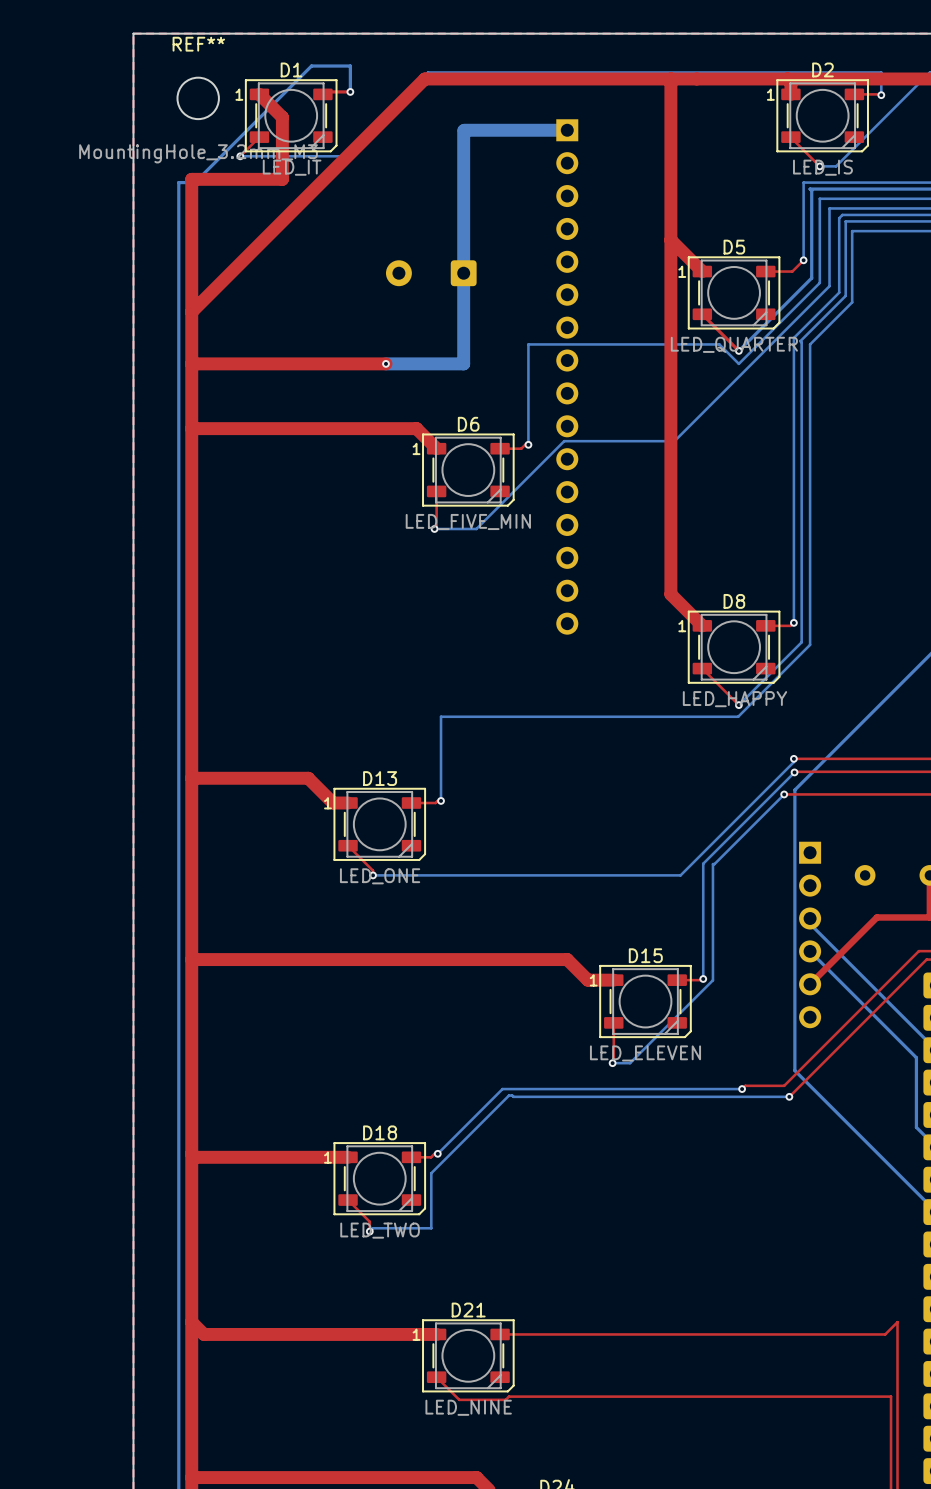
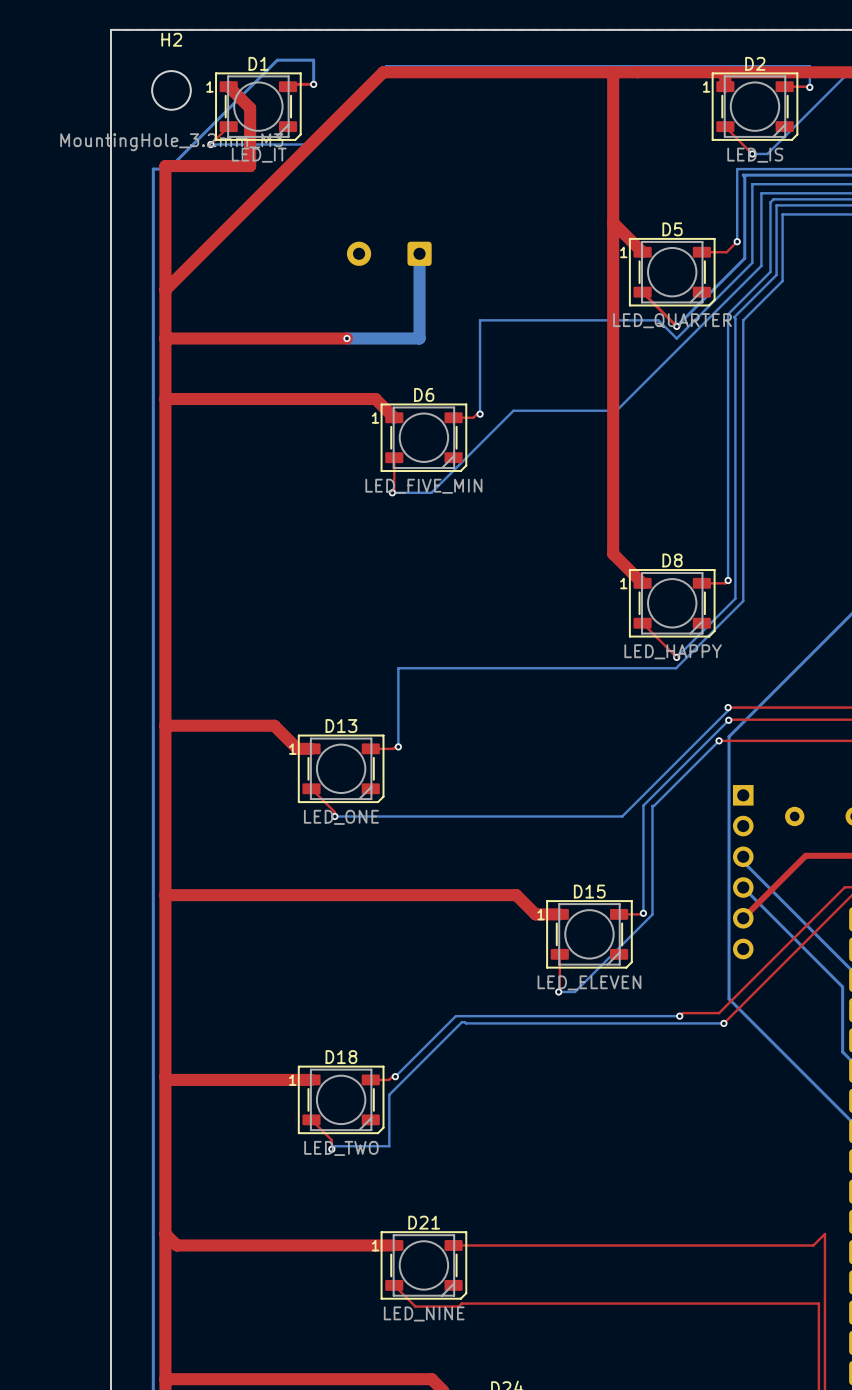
REF** name: REF** (198, 44) -> H2 (171, 39)
bottom track: (567, 130) (463, 130) (463, 273) -> none
part: (567, 376) -> none

